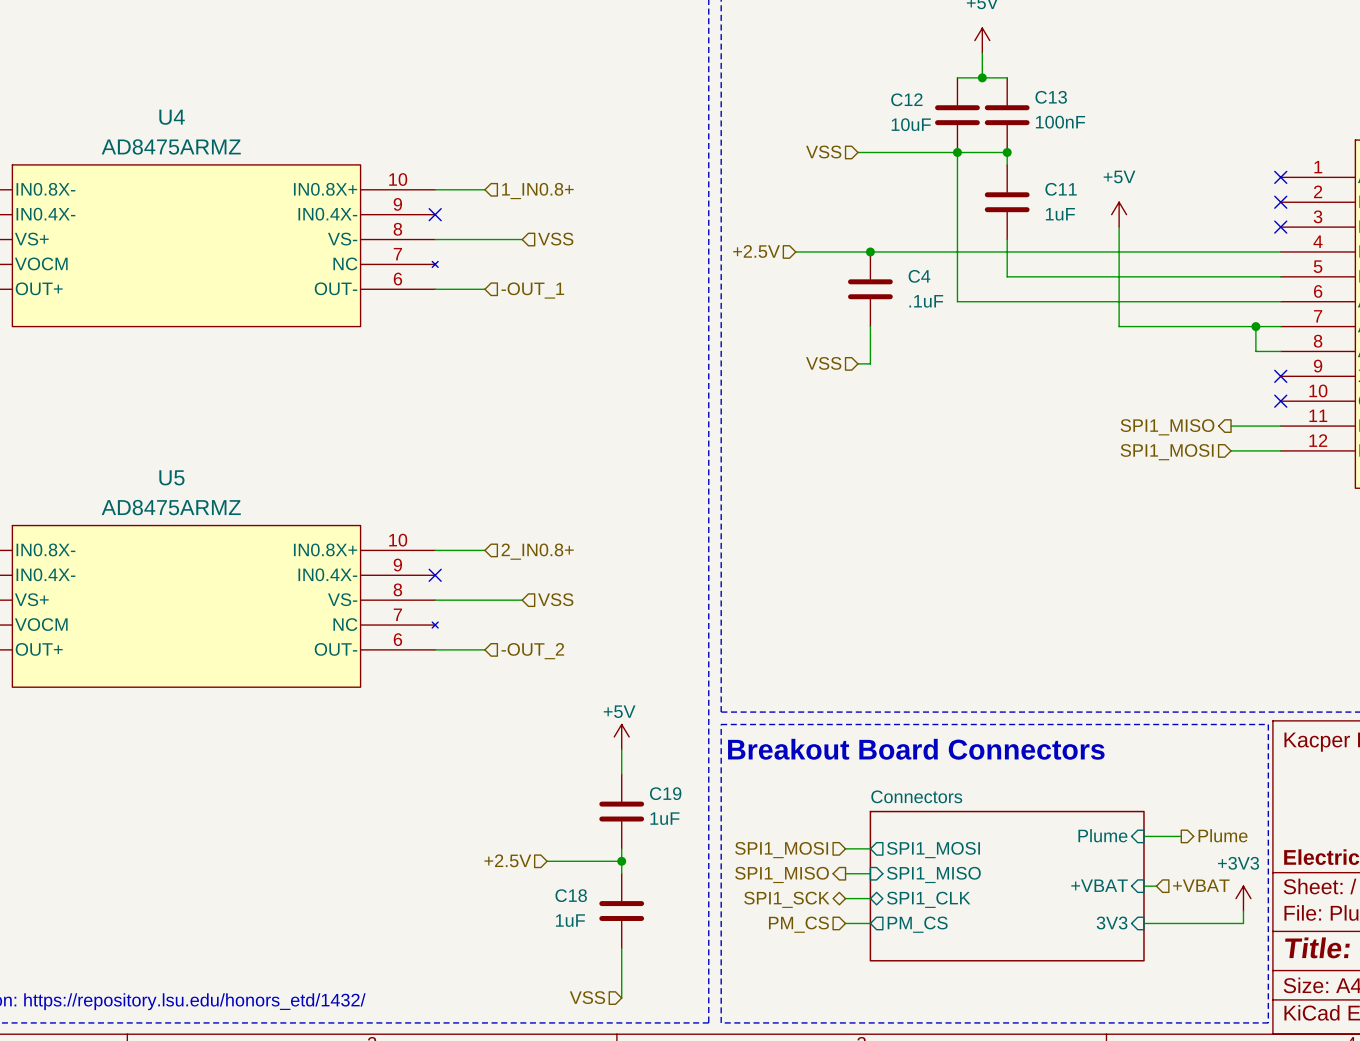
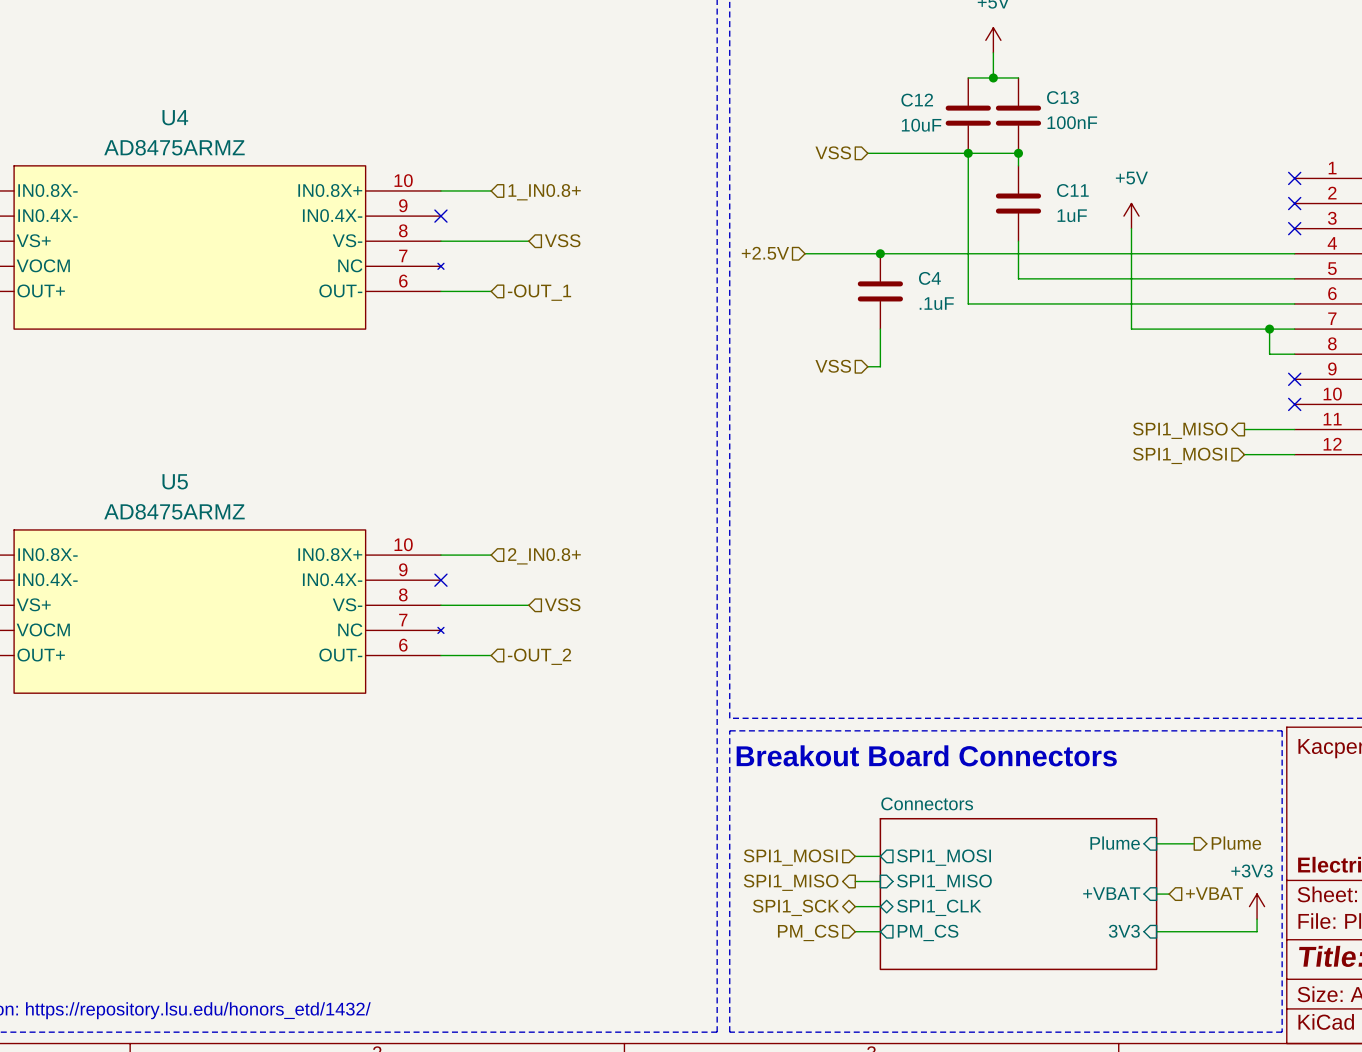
power symbol: +5V (621, 736) -> none
wire: (621, 749) (621, 774) -> none
C19: 1uF (621, 811) -> none
wire: (621, 848) (621, 873) -> none
hierarchical label: +2.5V (507, 860) -> none
wire: (547, 861) (621, 861) -> none
junction: (621, 861) -> none
C18: 1uF (621, 911) -> none
wire: (621, 948) (621, 998) -> none
hierarchical label: VSS (587, 997) -> none

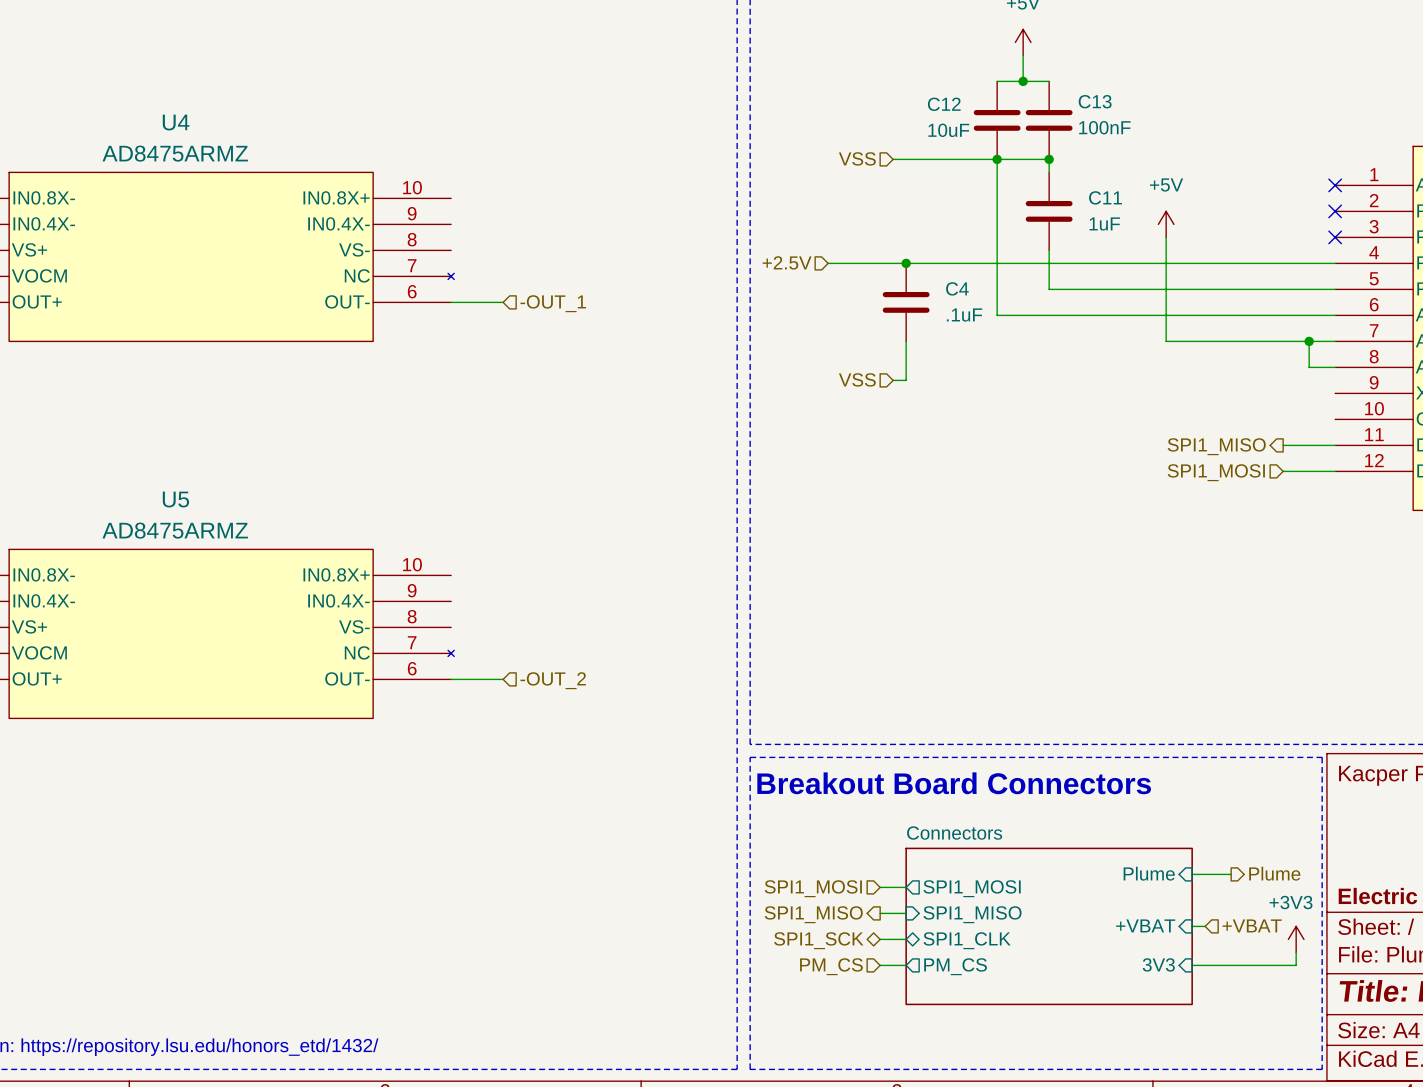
wire: (440, 190) (491, 190) -> none
hierarchical label: 1_IN0.8+ (544, 192) -> none
no-connect mark: (440, 216) -> none
hierarchical label: VSS (562, 240) -> none
wire: (440, 241) (528, 241) -> none
no-connect mark: (1294, 379) -> none
no-connect mark: (1294, 404) -> none
wire: (440, 555) (491, 555) -> none
hierarchical label: 2_IN0.8+ (544, 556) -> none
no-connect mark: (440, 580) -> none
hierarchical label: VSS (562, 604) -> none
wire: (440, 605) (528, 605) -> none

